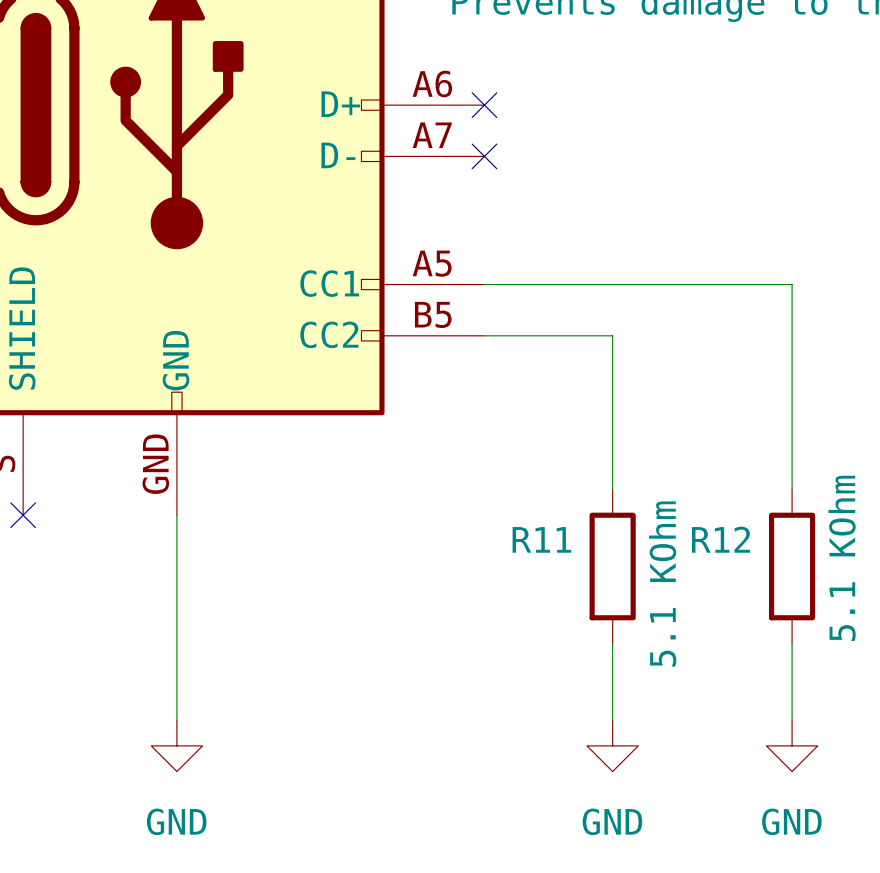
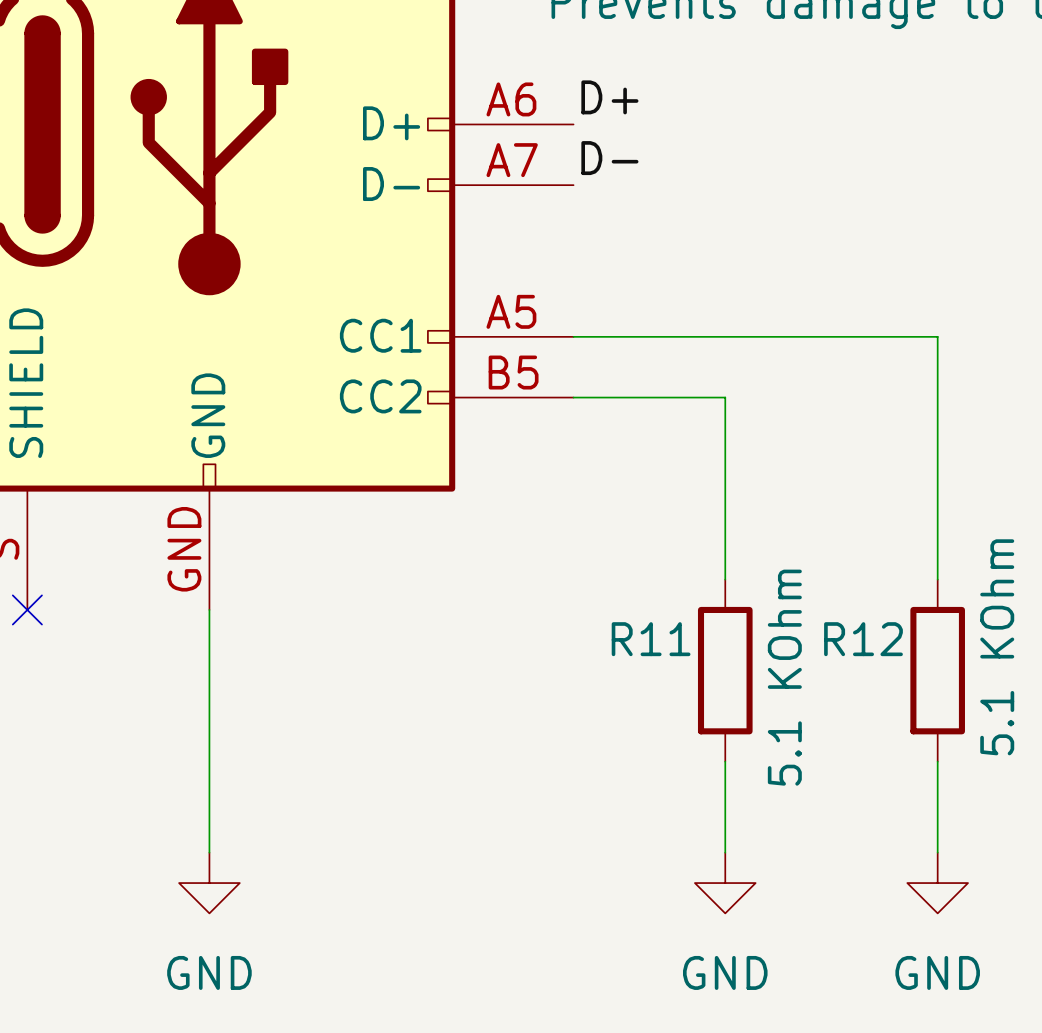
label: none -> D+ (609, 97)
no-connect mark: (484, 105) -> none
label: none -> D- (609, 158)
no-connect mark: (484, 156) -> none

